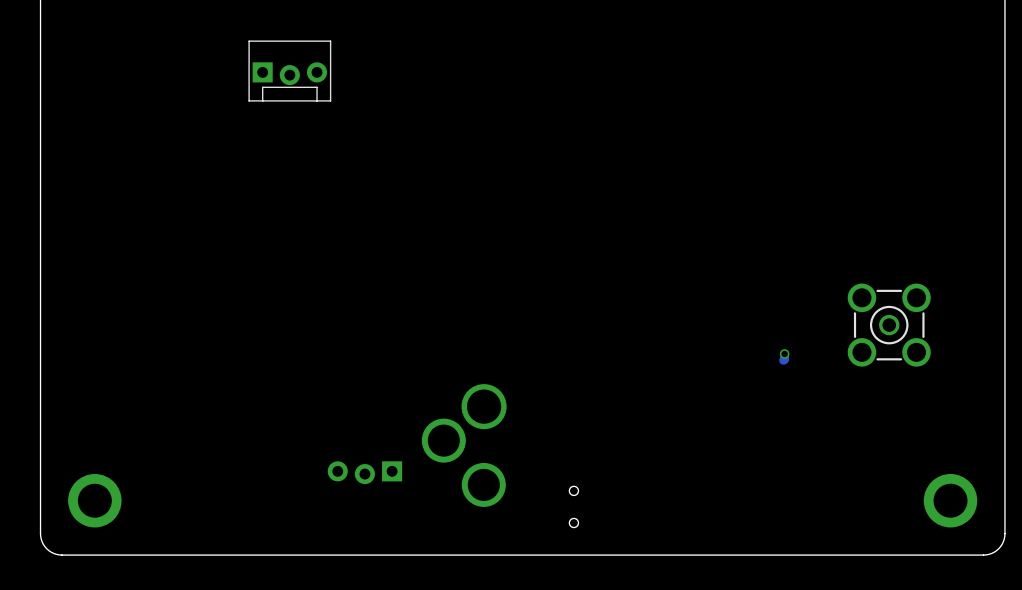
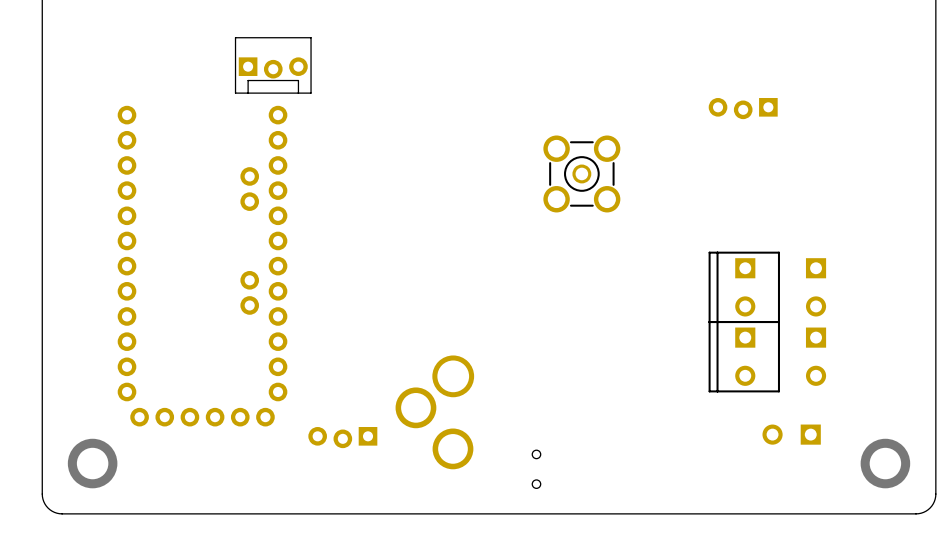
part: none -> (743, 108)
part: none -> (581, 173)
part: none -> (202, 266)
part: none -> (744, 287)
part: none -> (816, 287)
part: (889, 325) -> none
track: (784, 353) (783, 360) -> none
via: (784, 353) -> none
part: none -> (744, 356)
part: none -> (816, 356)
part: none -> (791, 434)

